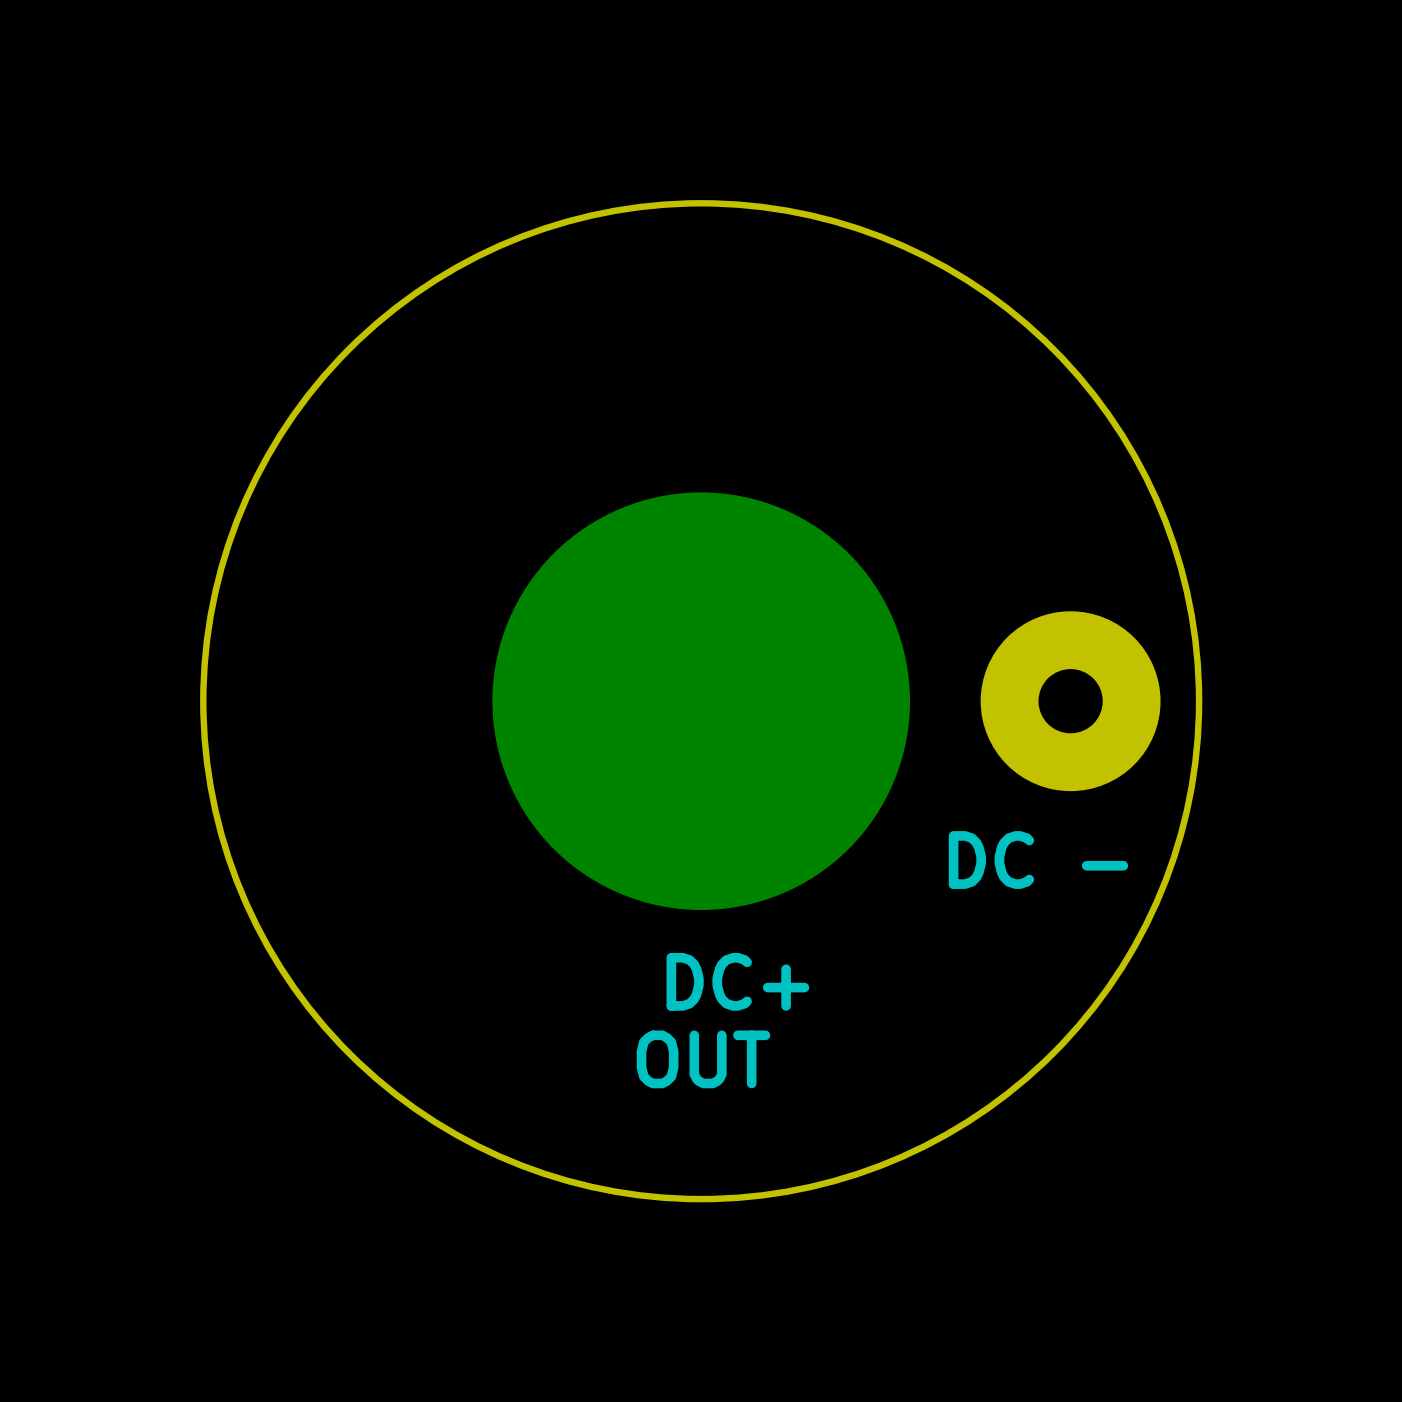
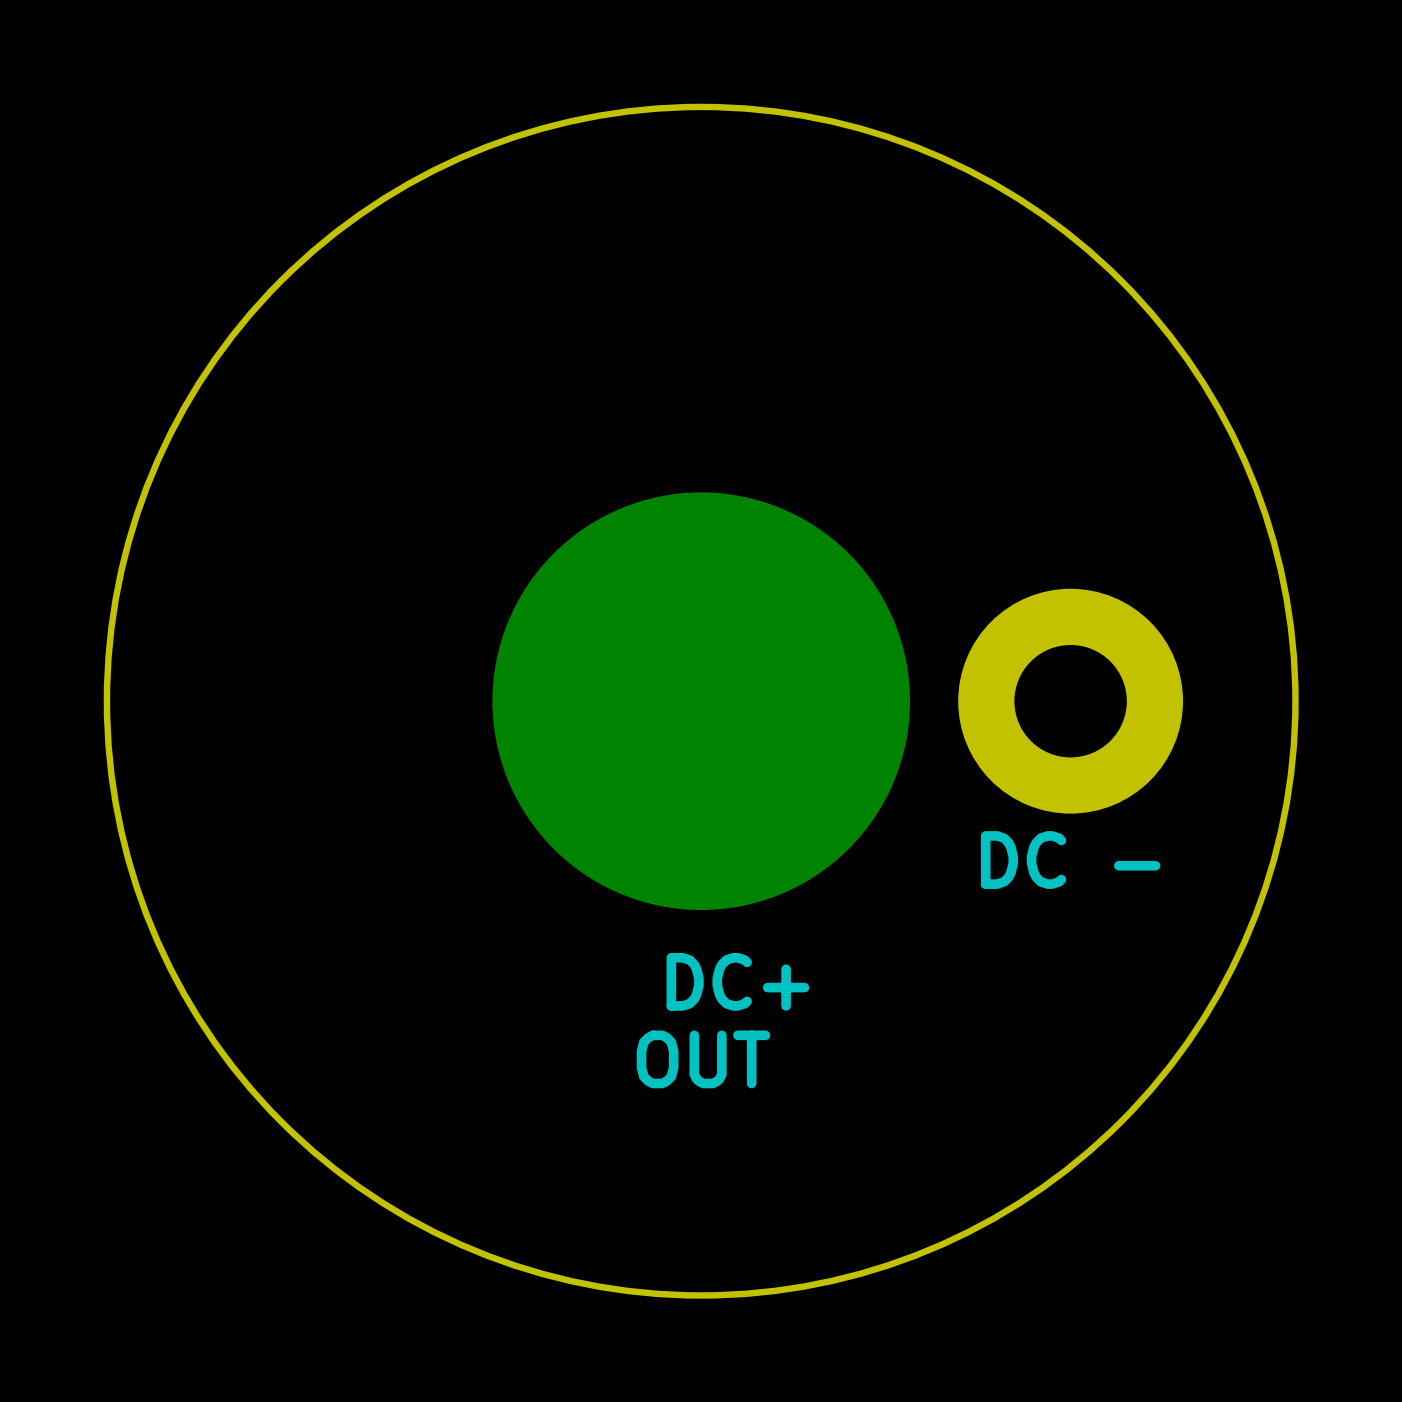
round board edge size: [200, 200, 1203, 1203] -> [103, 103, 1299, 1299]
part footprint: [980, 611, 1161, 792] -> [958, 588, 1184, 814]
text position: DC - (1038, 860) -> DC - (1070, 860)

